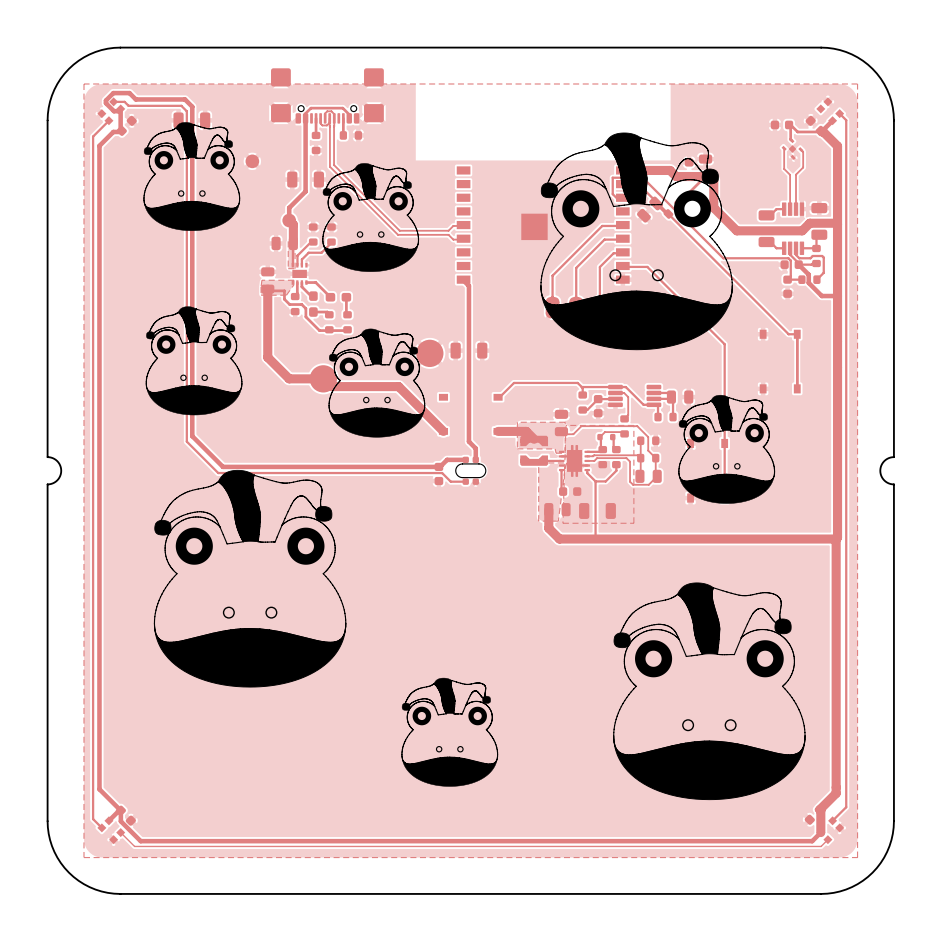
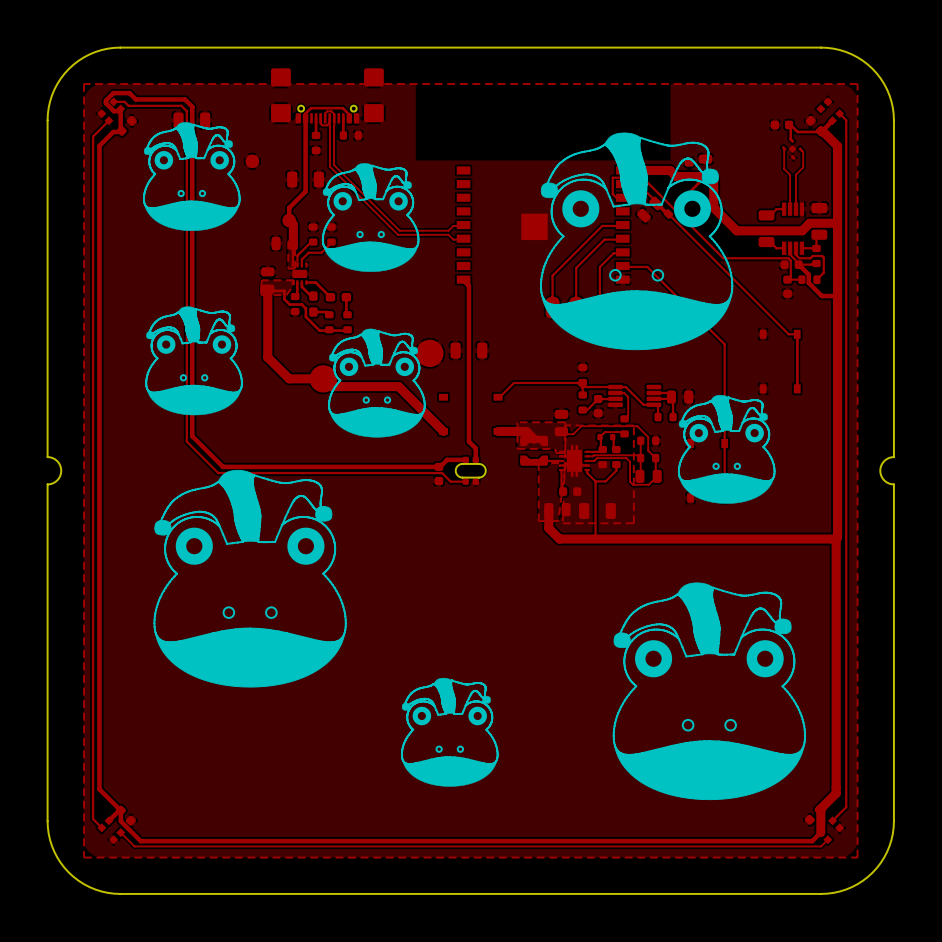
part: none -> (582, 374)

